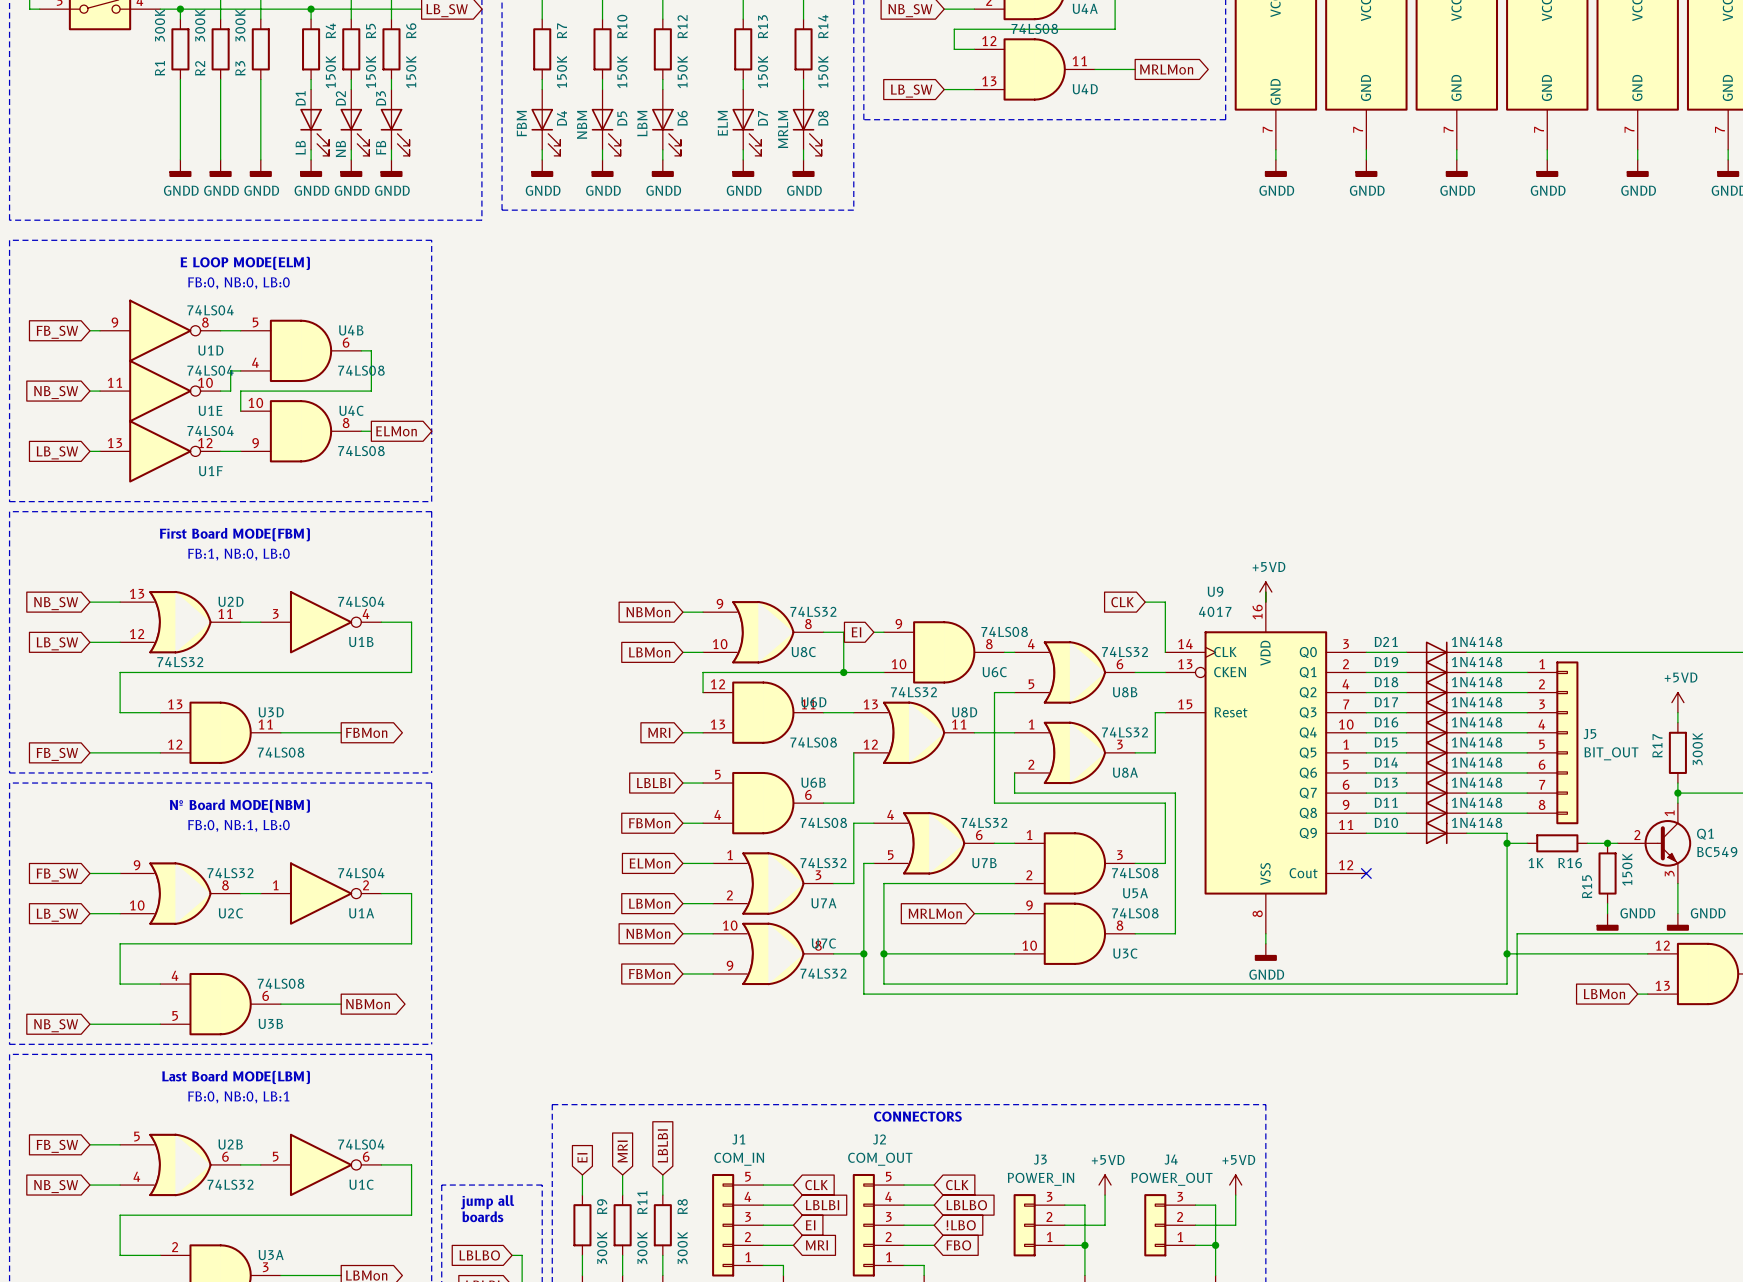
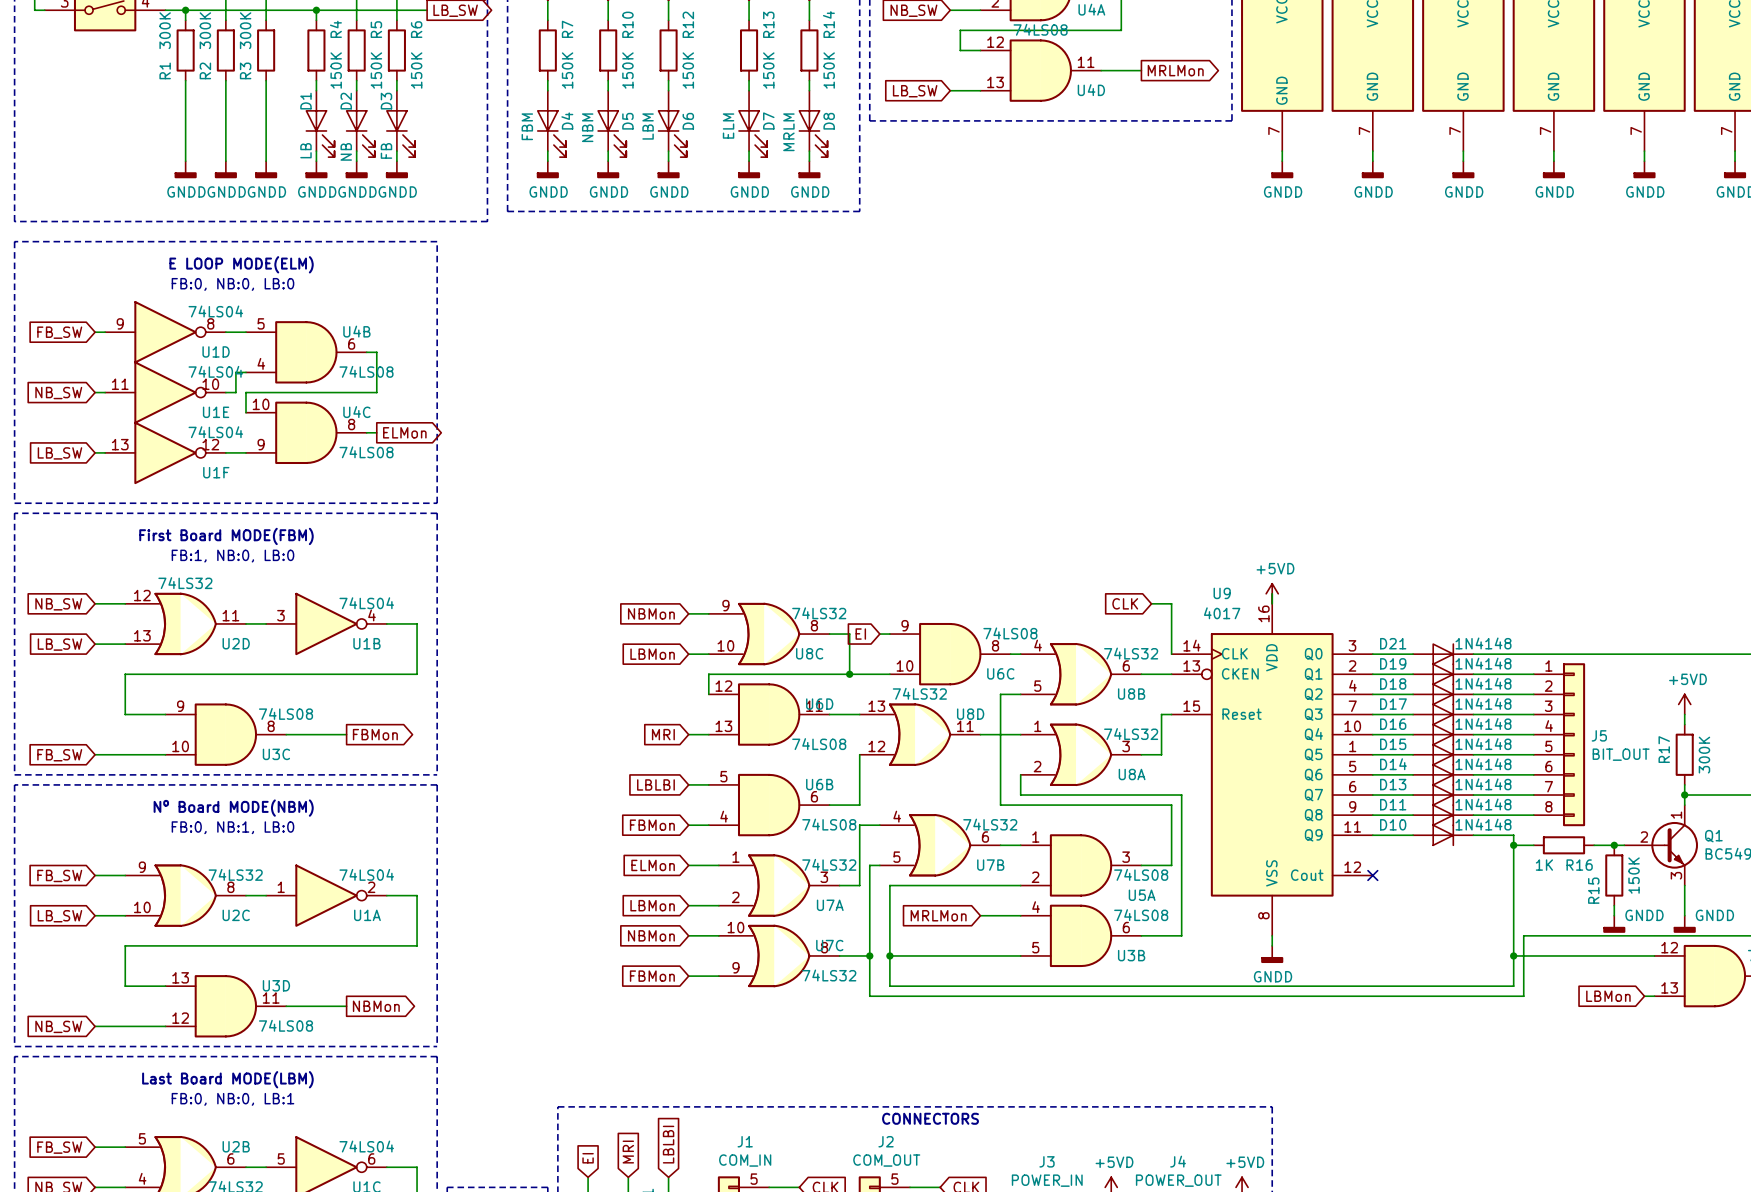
U2D flip: as is (180, 622) -> up-down (185, 623)
U3D position: (220, 732) -> (225, 1006)
U3C position: (1074, 933) -> (225, 734)
U3B position: (220, 1004) -> (1081, 935)

